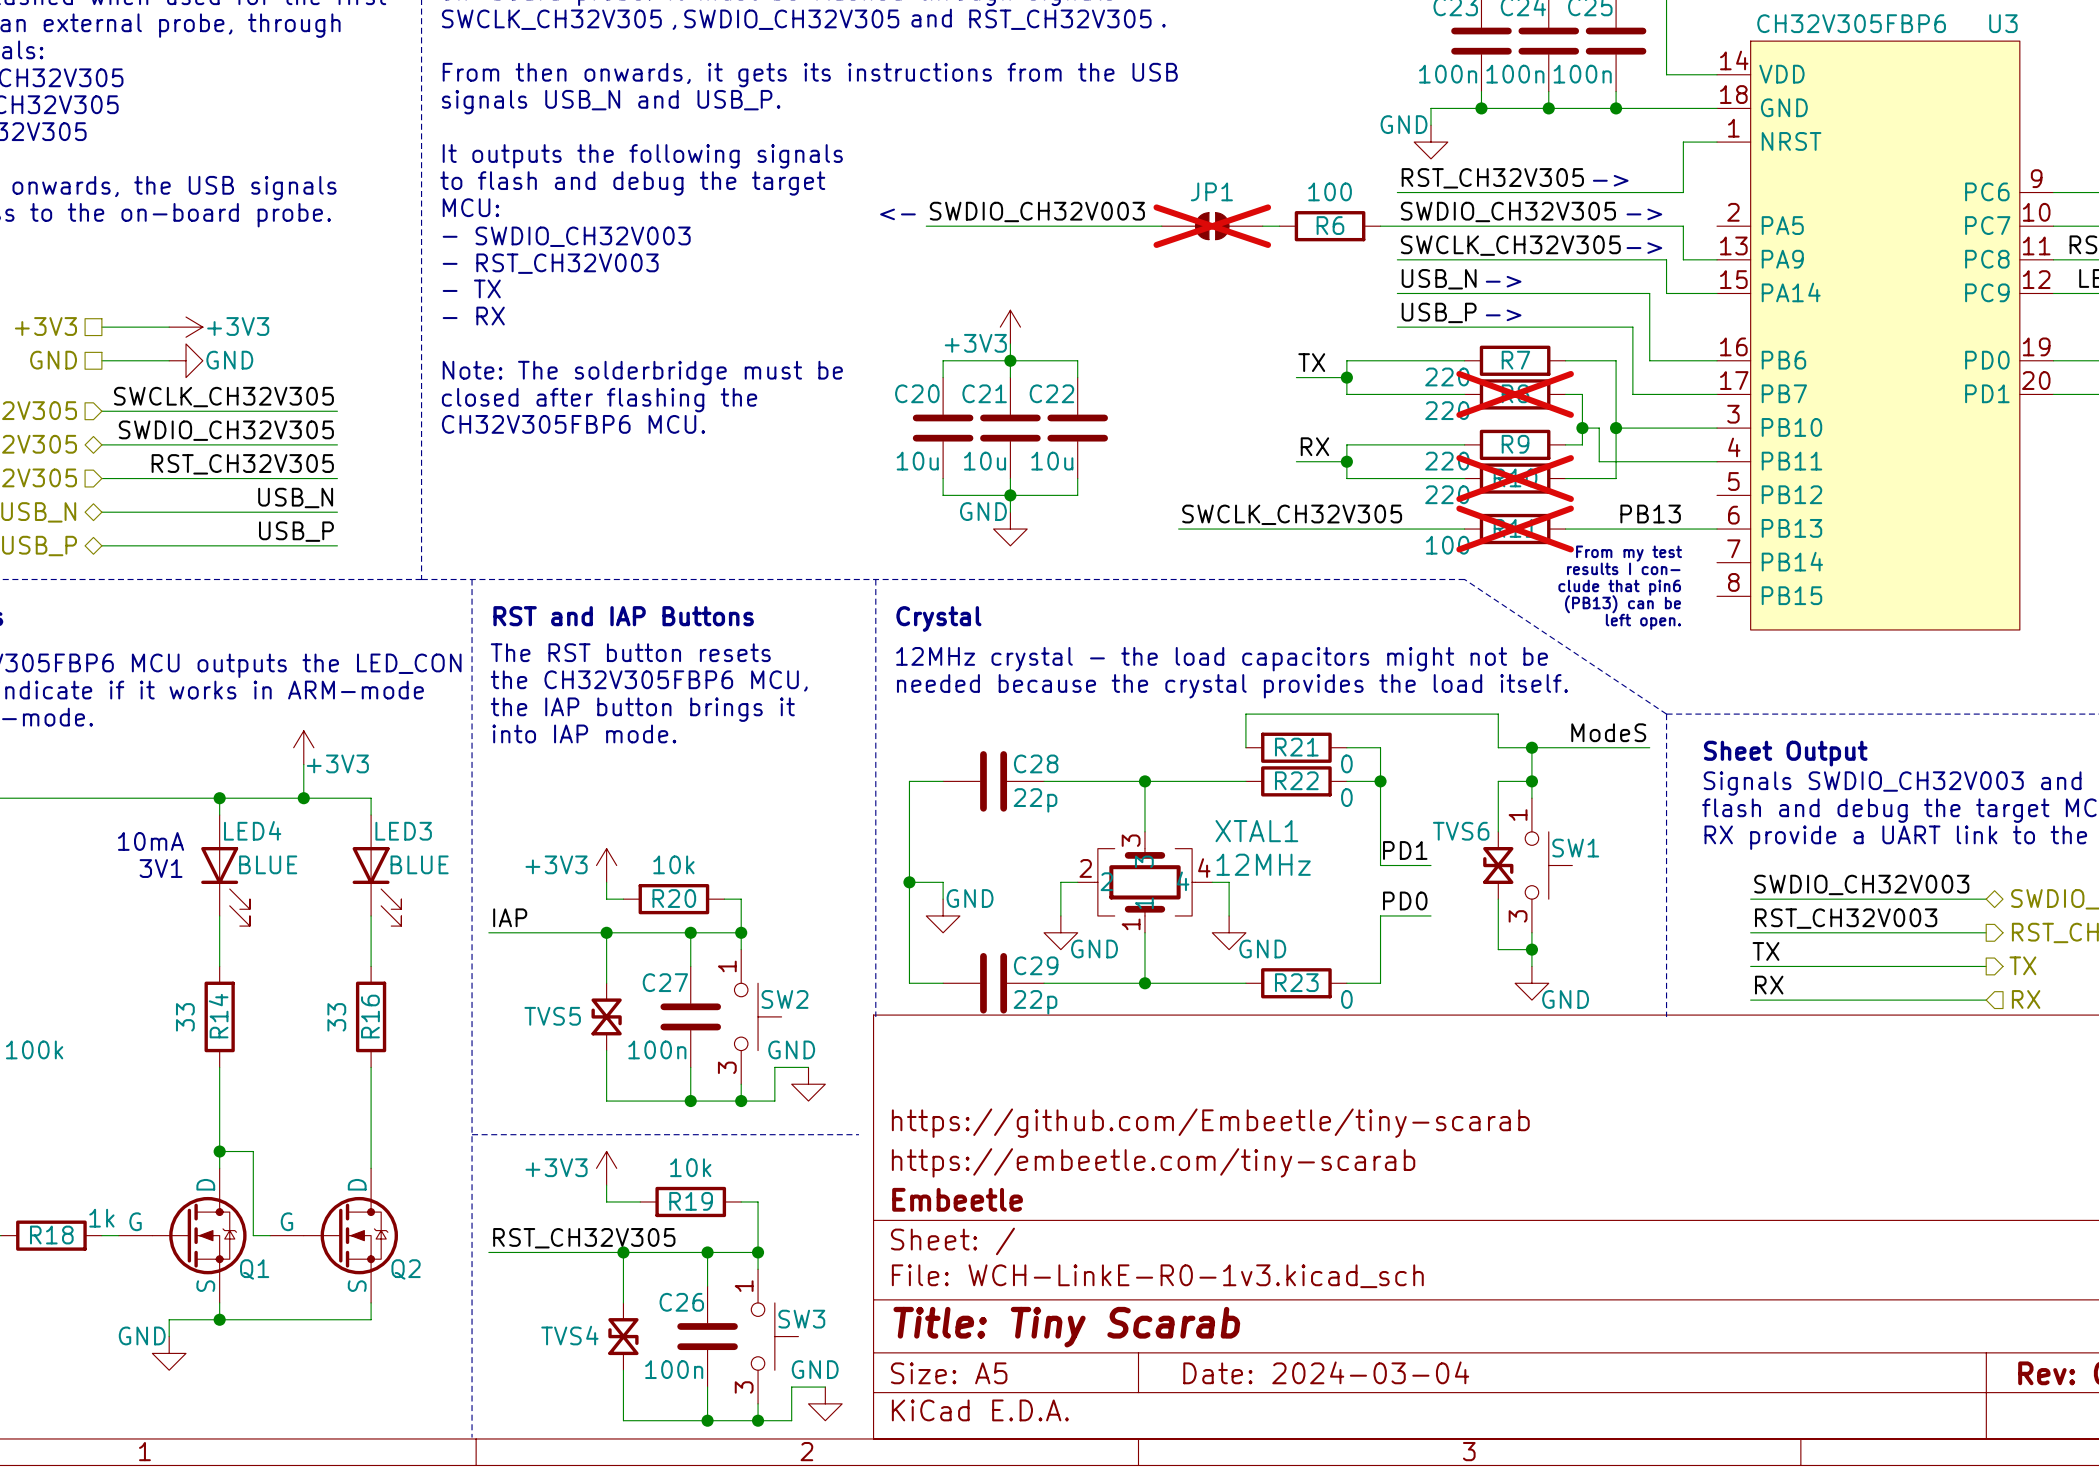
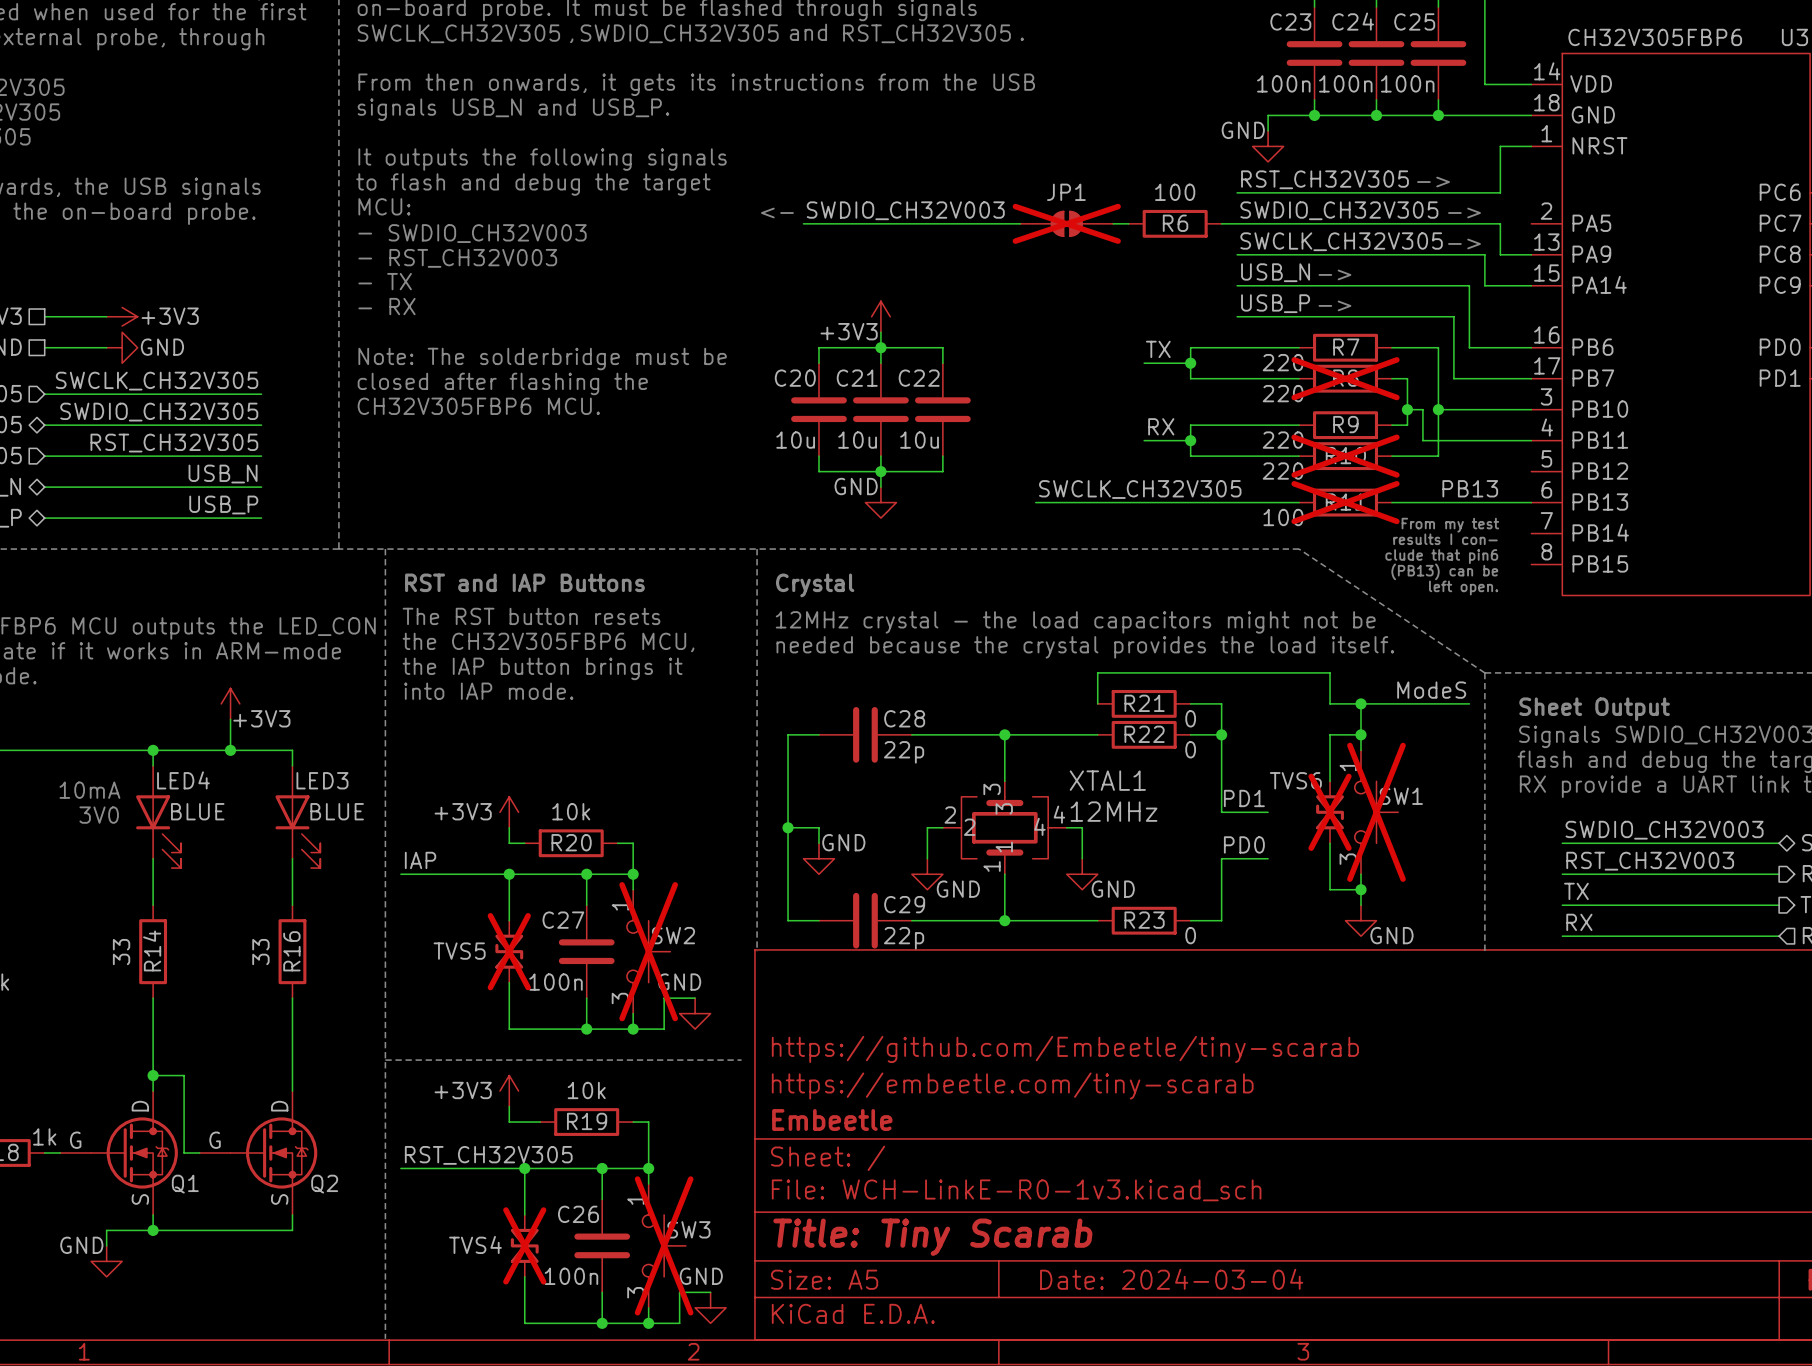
TVS6 do-not-place cross: none -> (1330, 812)
SW1 do-not-place cross: none -> (1376, 812)
text: 3V1 (161, 868) -> 3V0 (99, 815)
TVS5 do-not-place cross: none -> (509, 951)
SW2 do-not-place cross: none -> (648, 951)
TVS4 do-not-place cross: none -> (524, 1245)
SW3 do-not-place cross: none -> (664, 1245)

